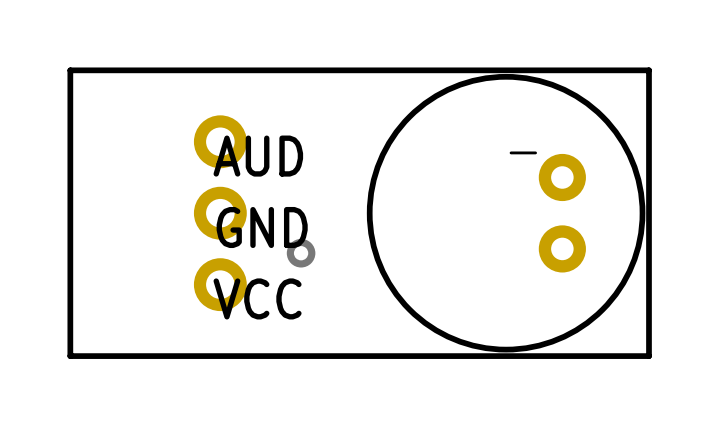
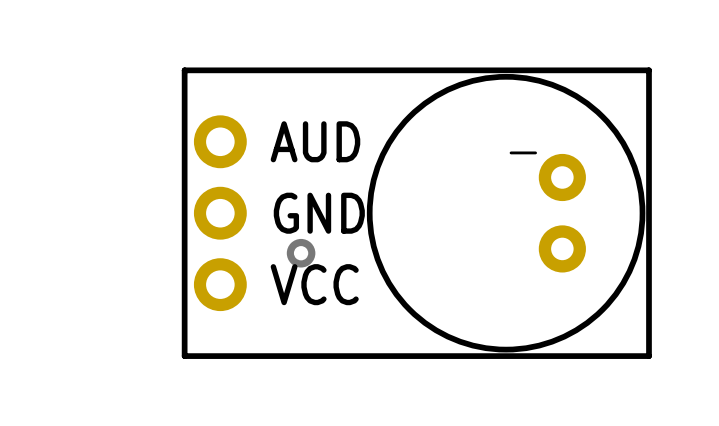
board edge: (184, 70) (70, 70) (70, 356) (184, 356) -> (184, 70) (184, 356)
text position: AUD (258, 156) -> AUD (315, 141)
text position: GND (262, 227) -> GND (319, 213)
text position: VCC (257, 298) -> VCC (314, 284)

